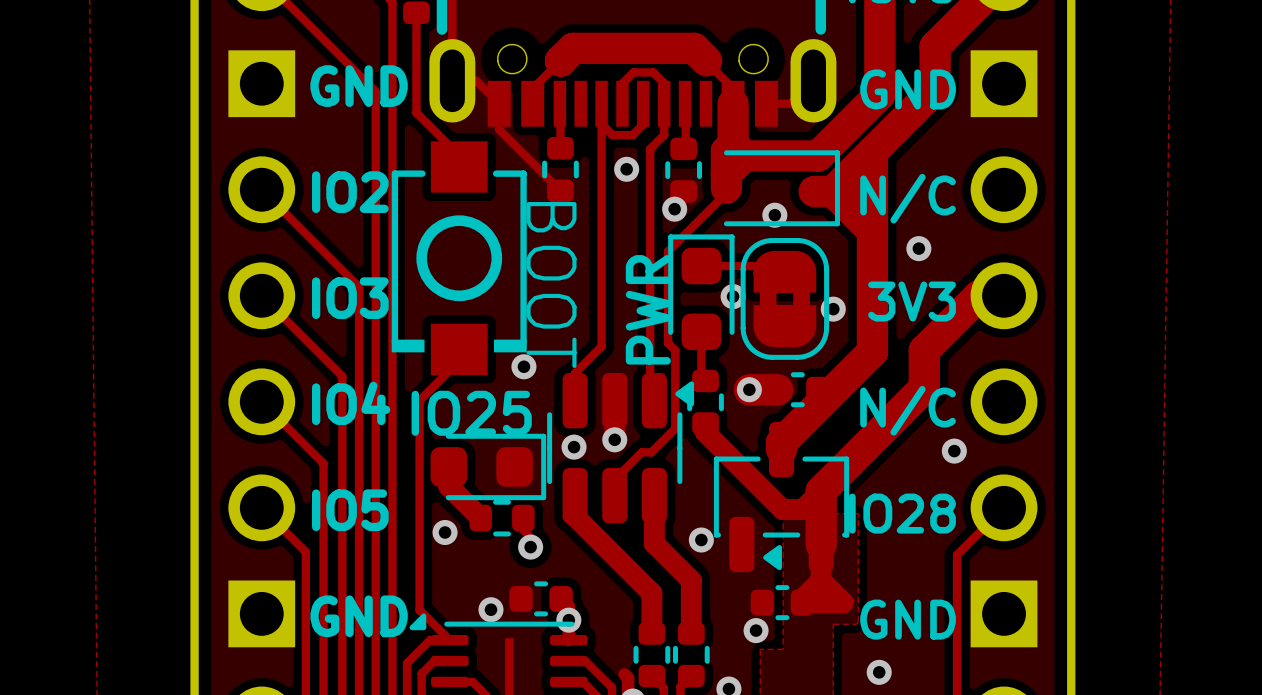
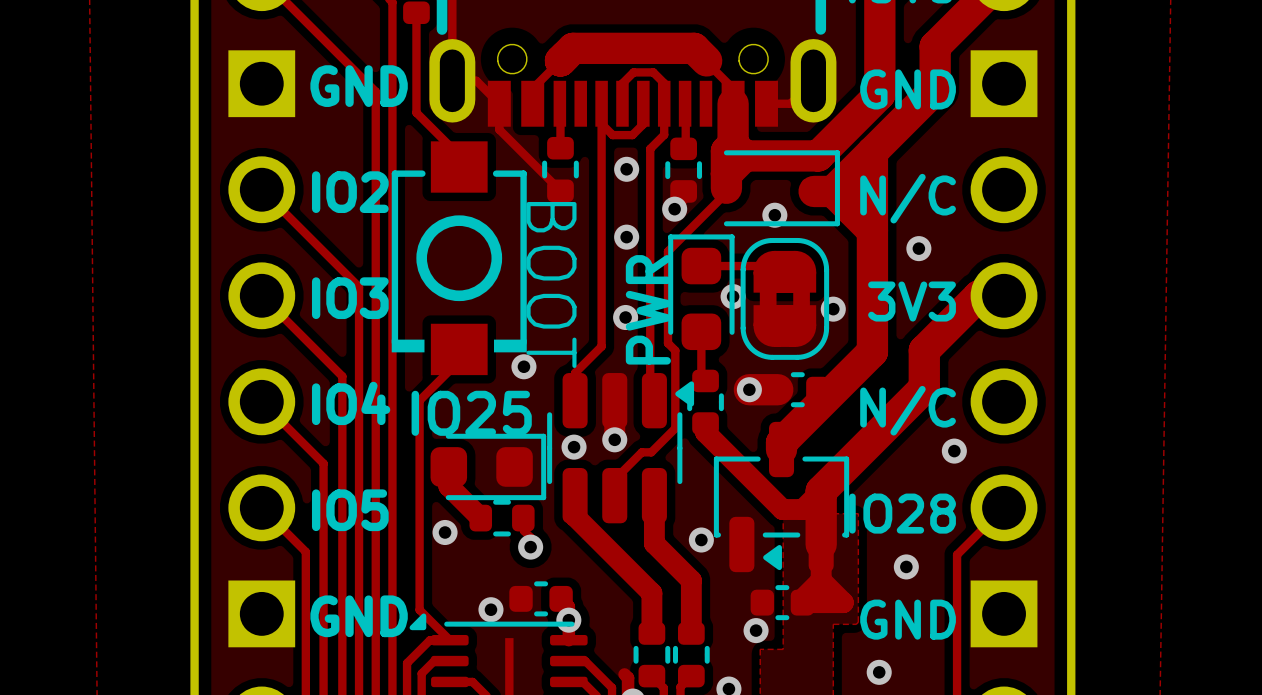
via: none -> (626, 237)
via: none -> (625, 317)
via: none -> (906, 566)

